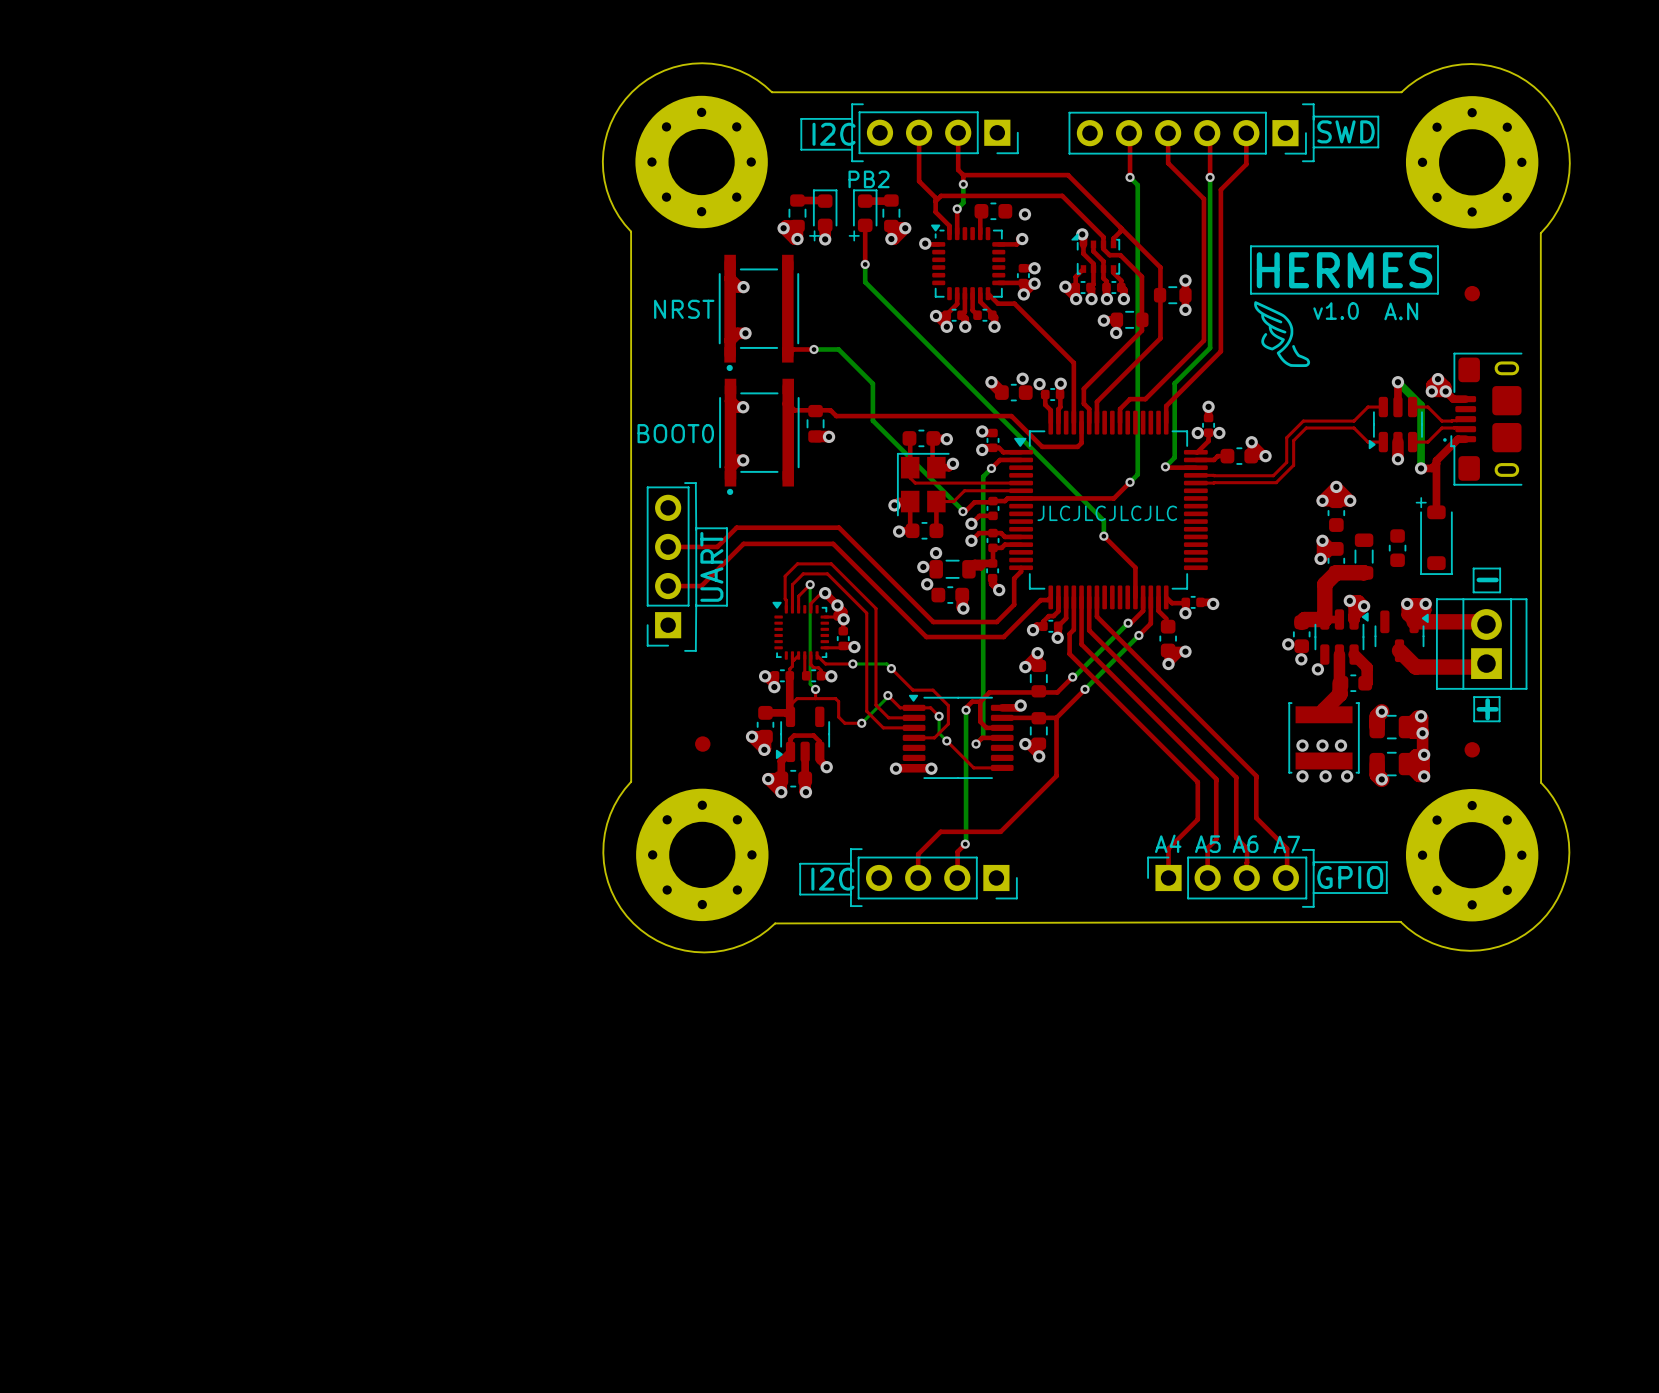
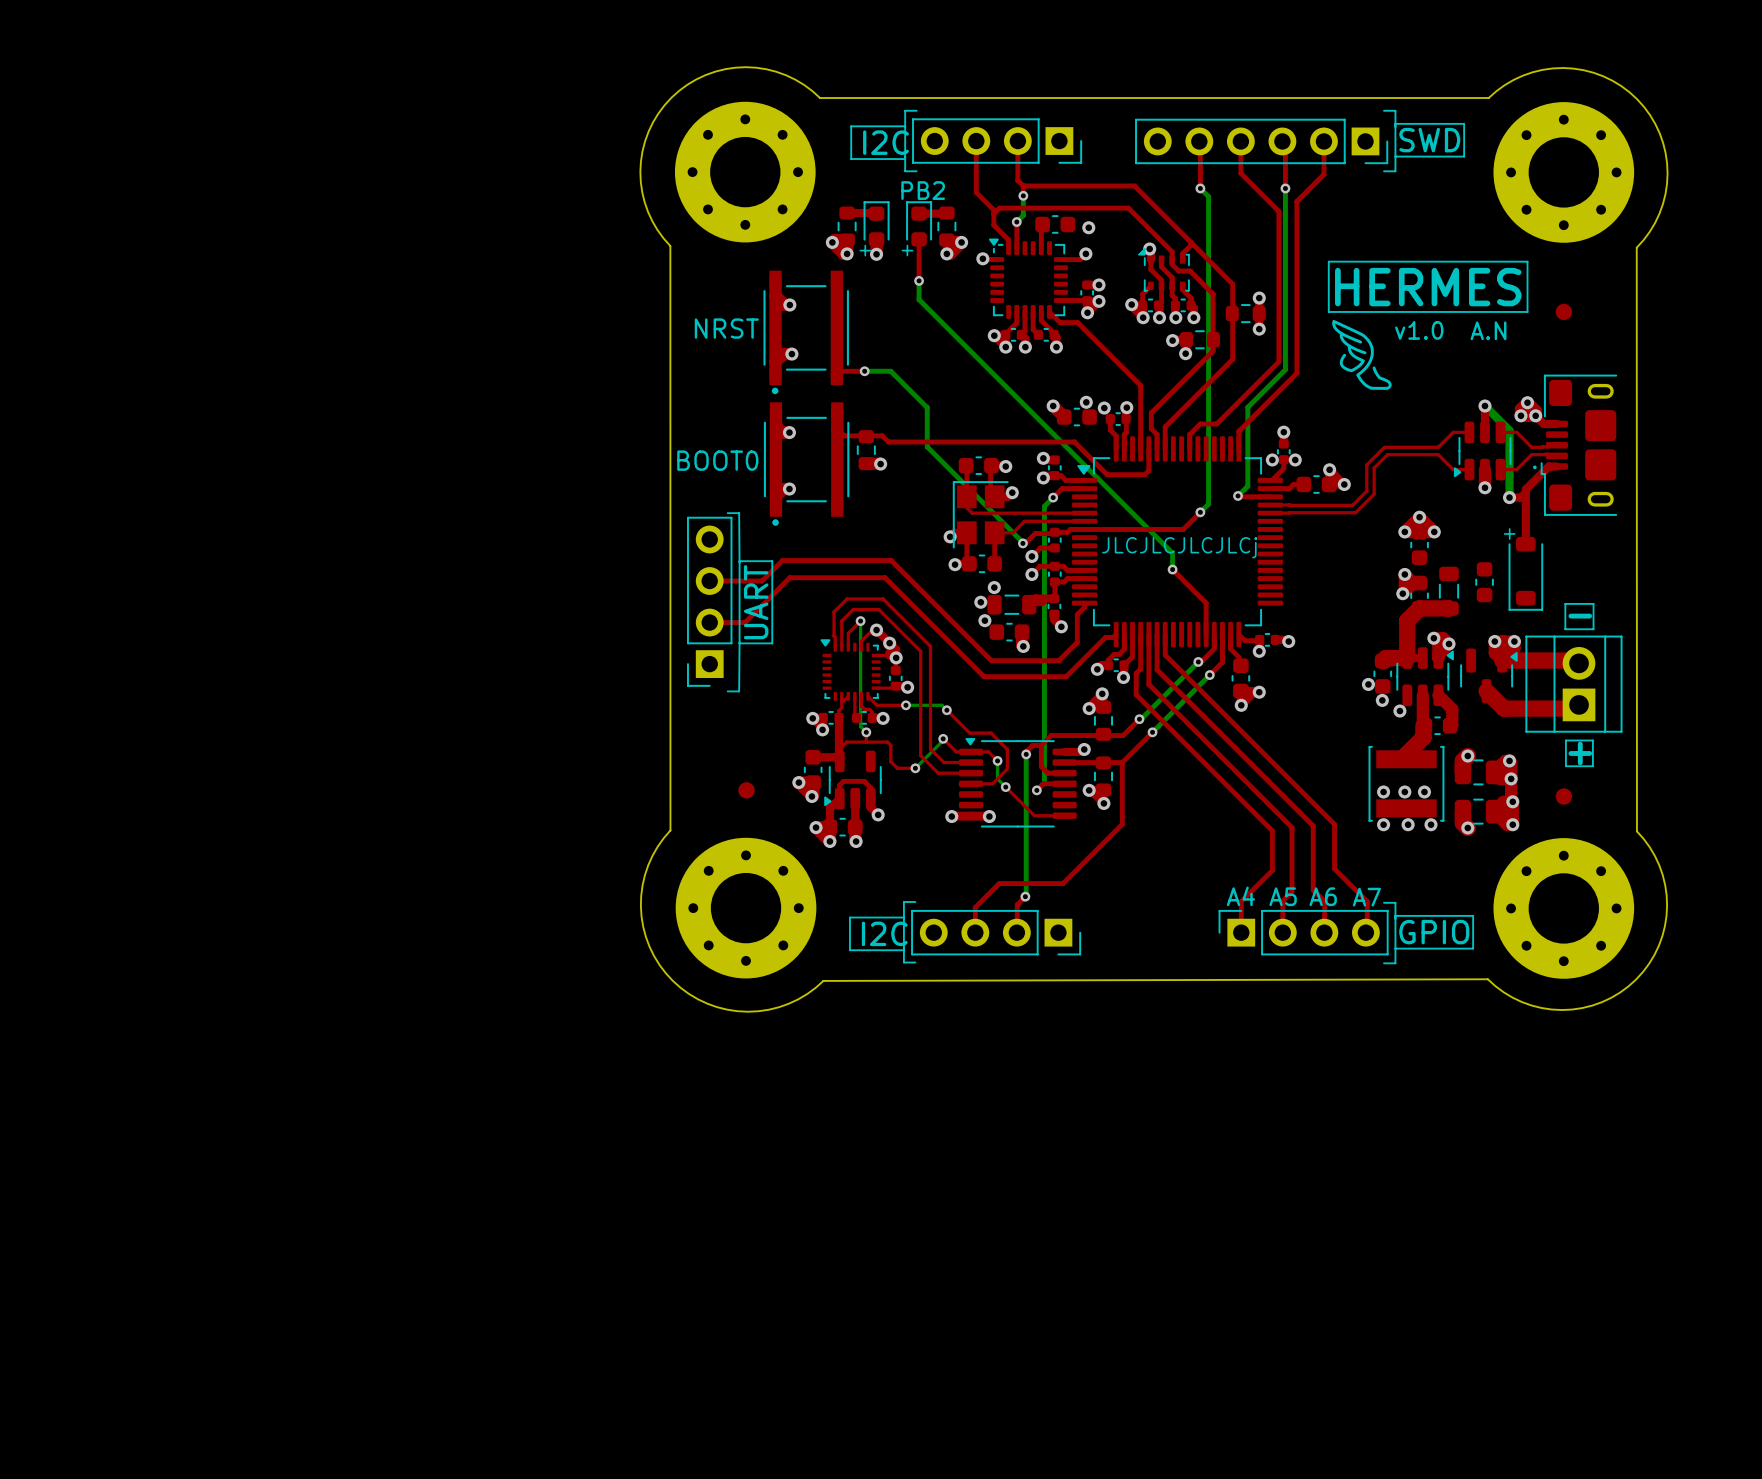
text: JLCJLCJLCJLC (1107, 513) -> JLCJLCJLCJLCj (1179, 547)

